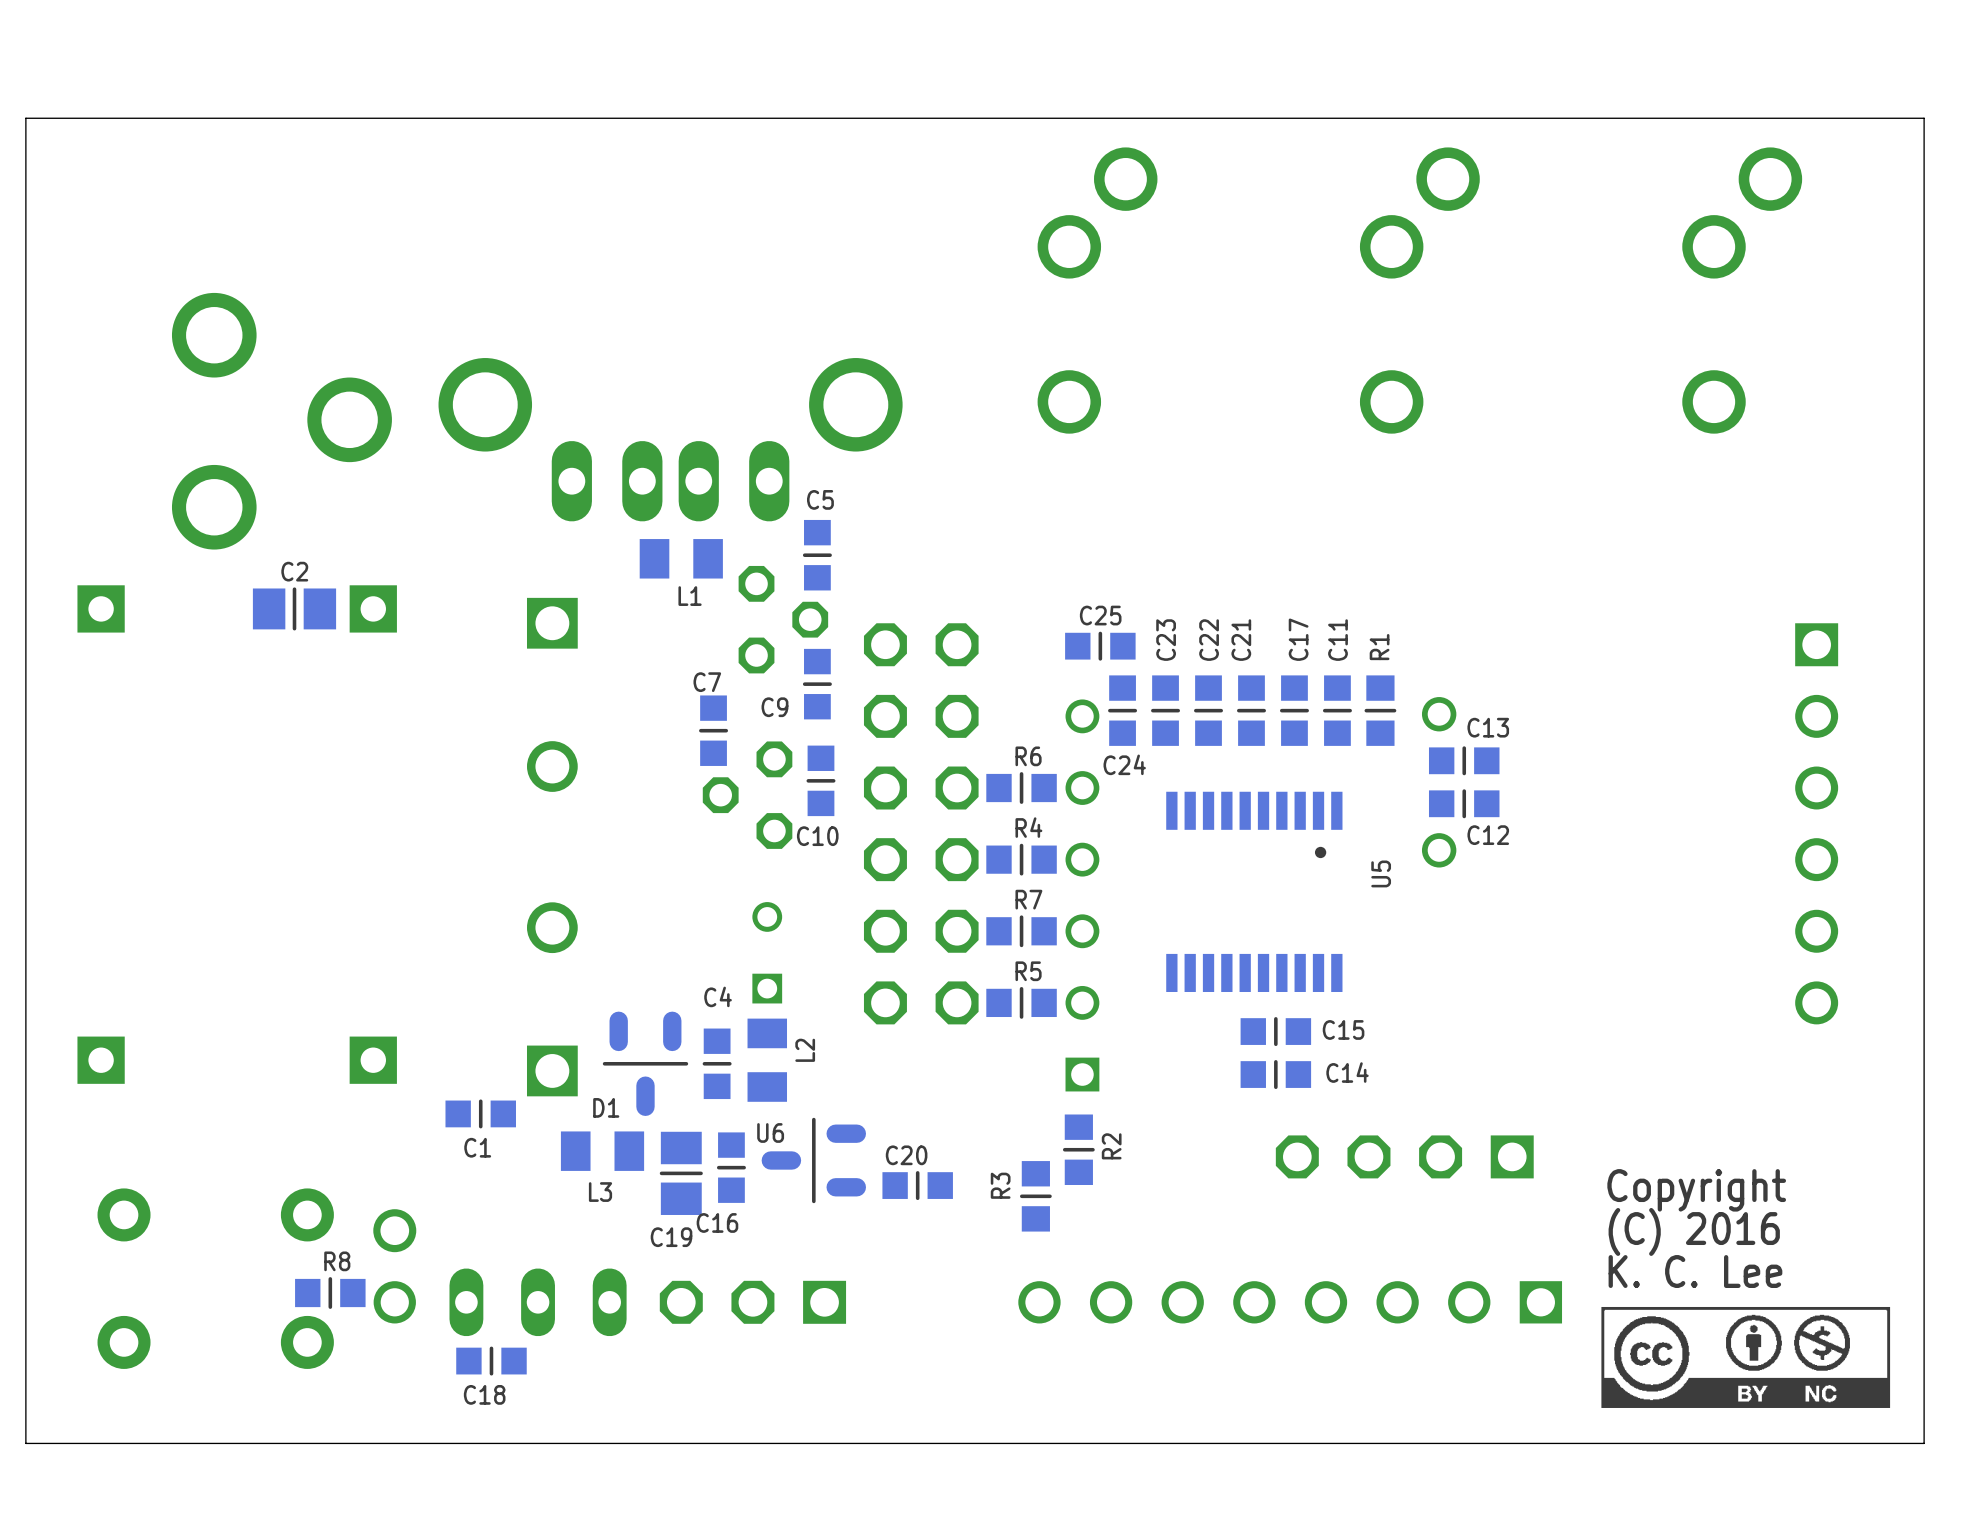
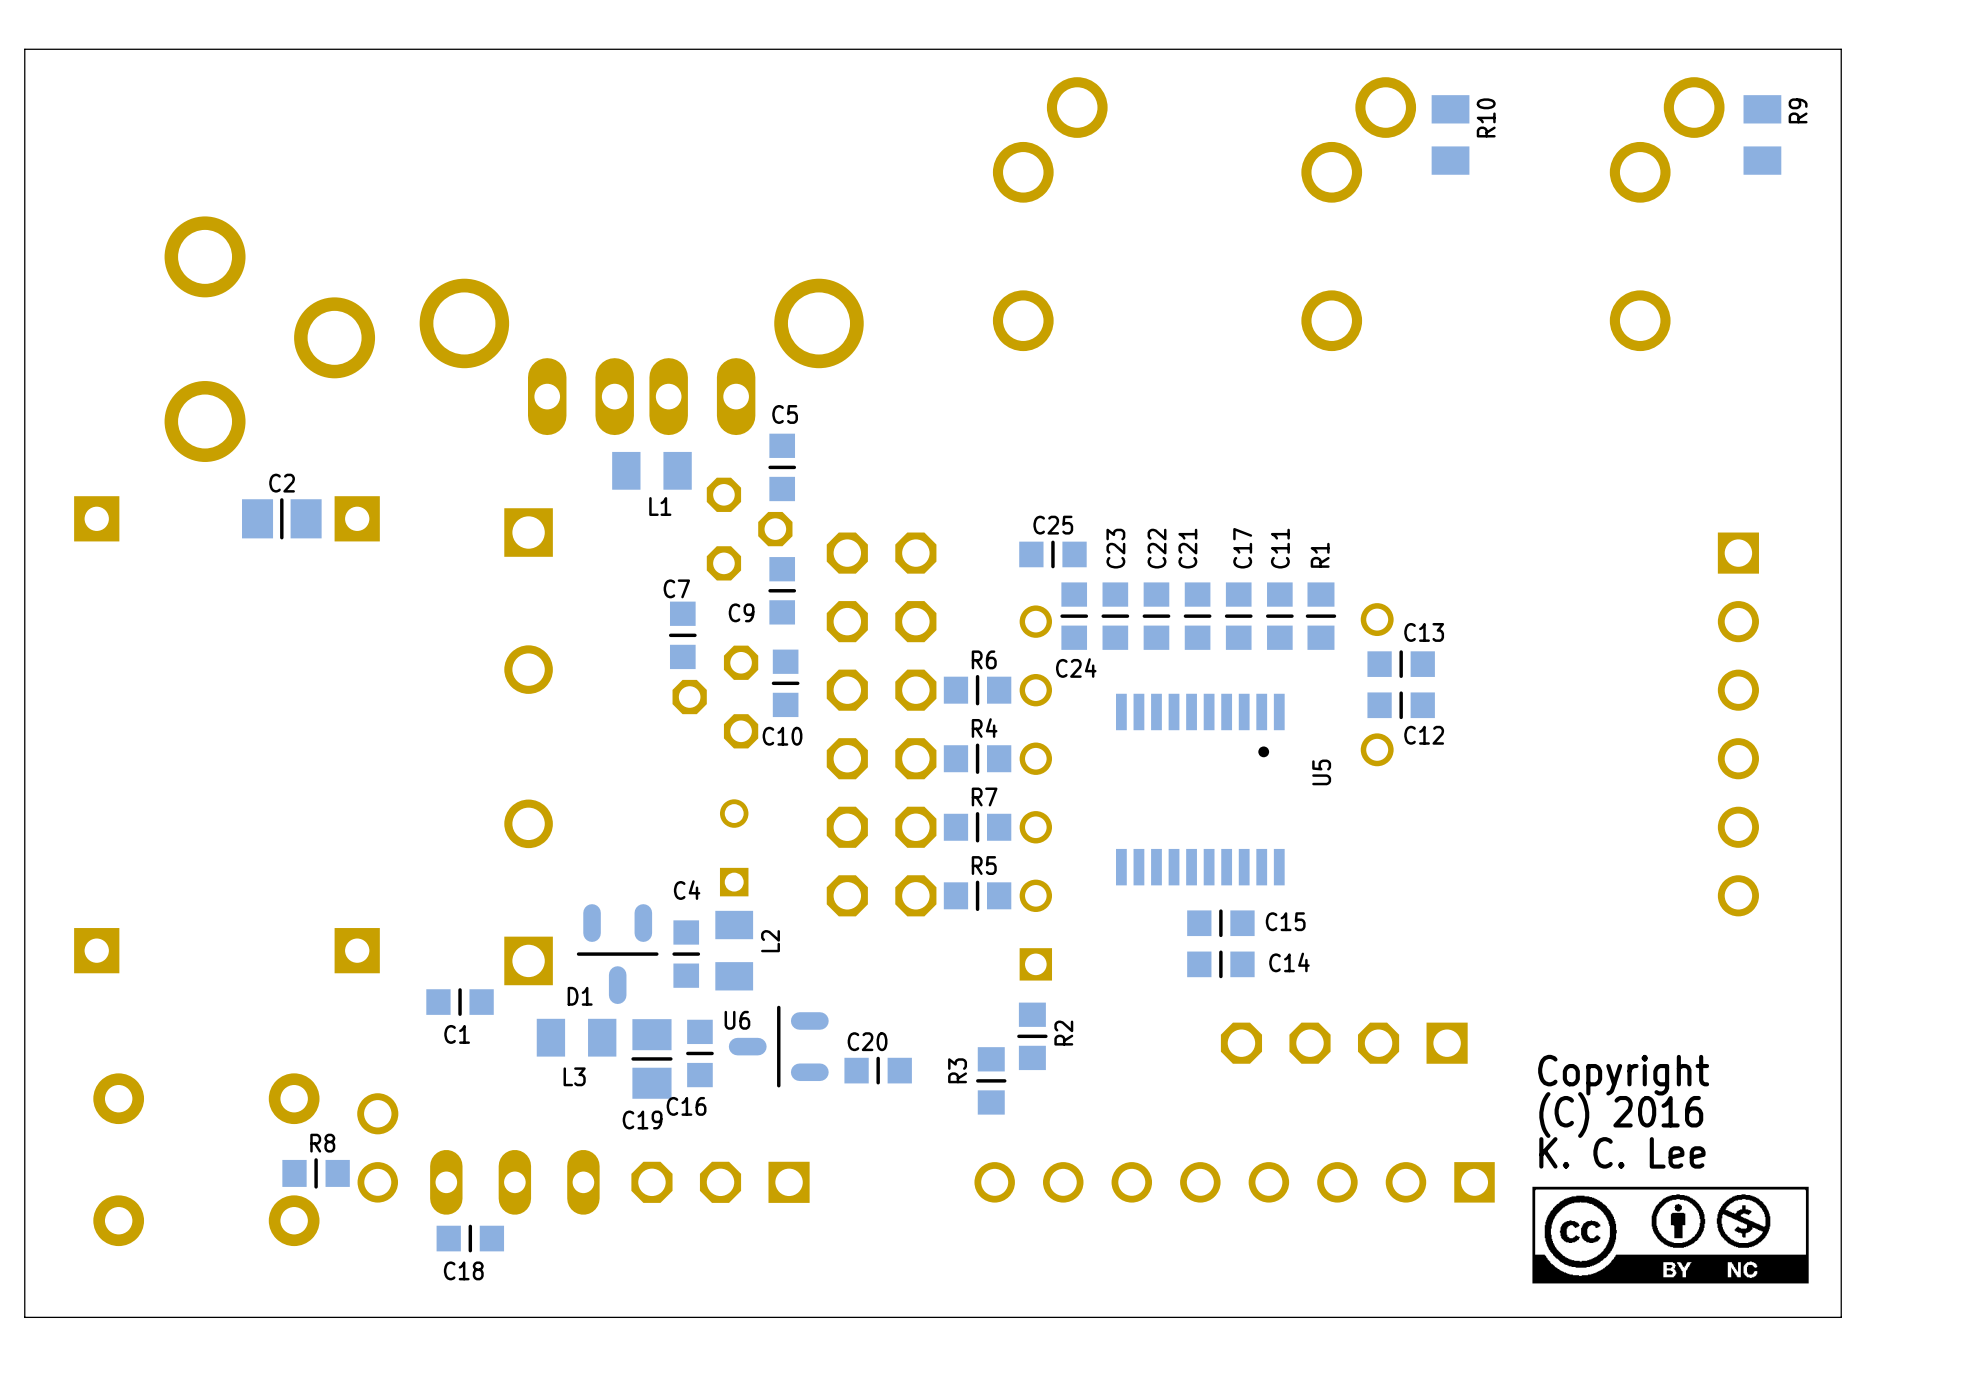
R10: none -> (1450, 134)
R9: none -> (1762, 134)

